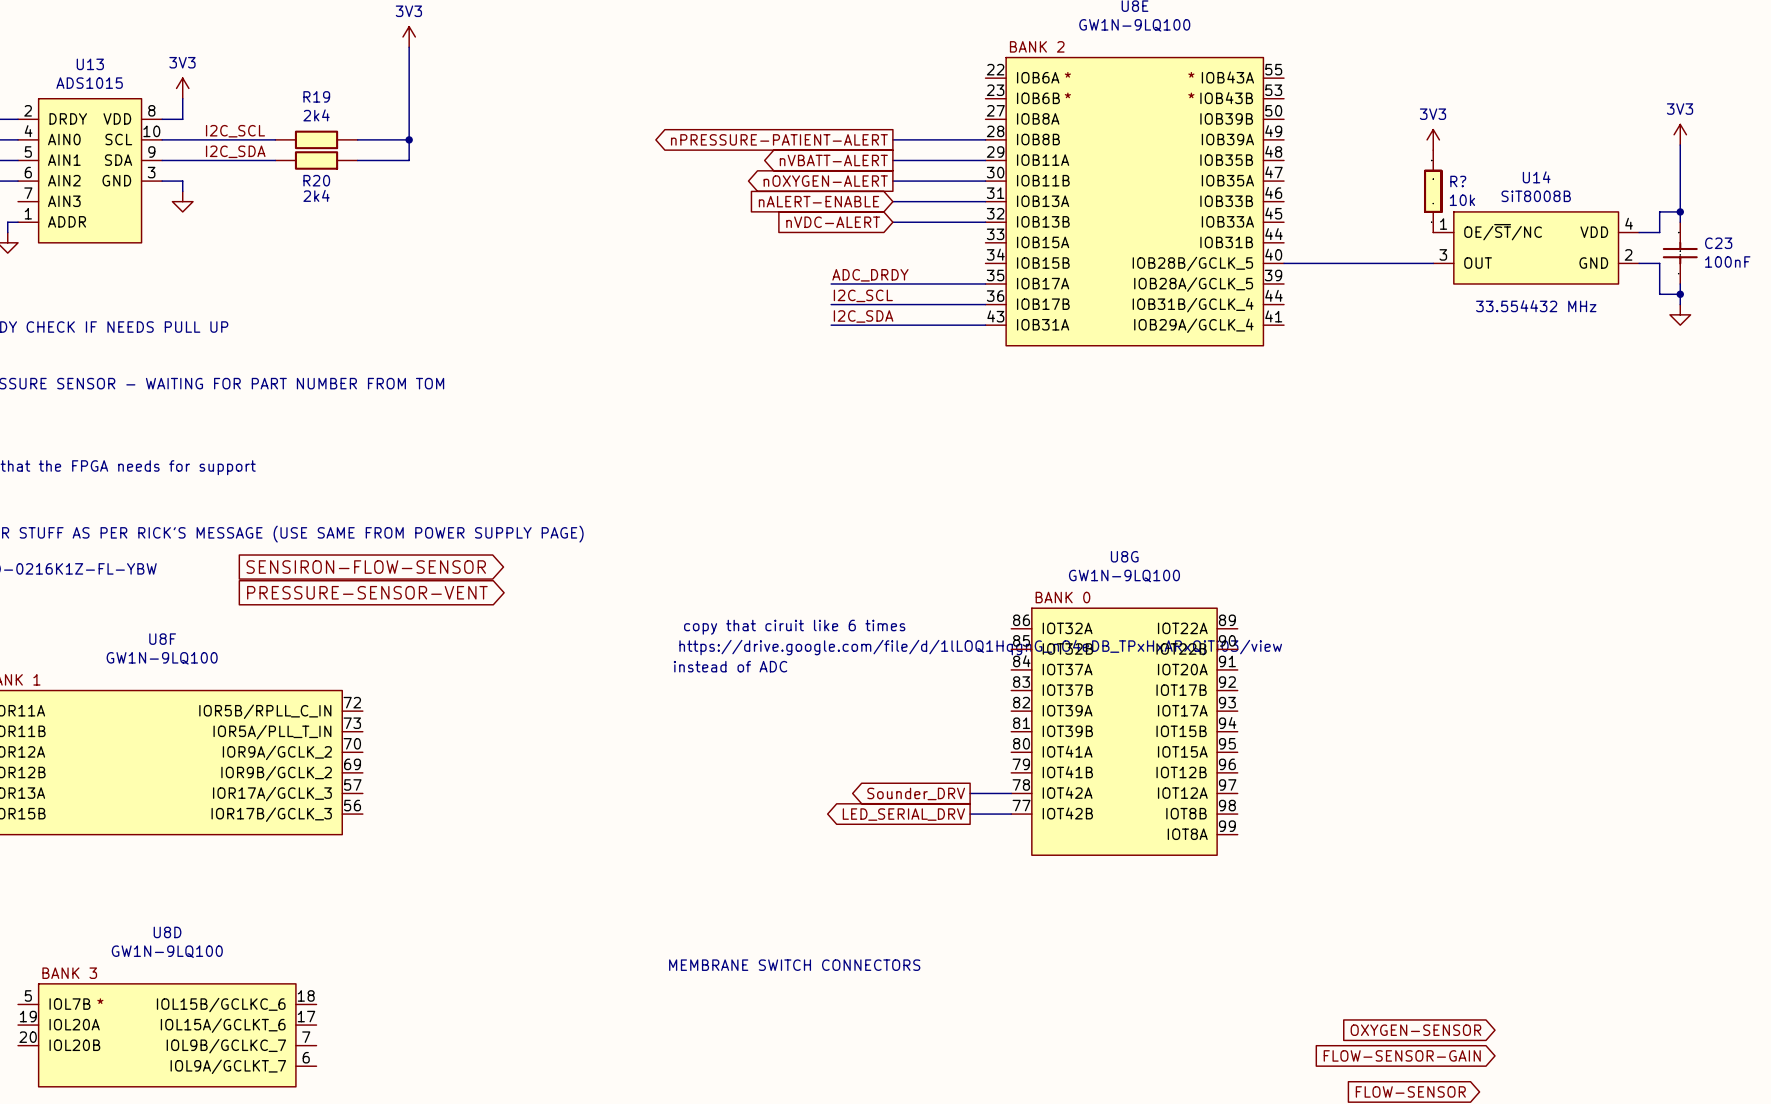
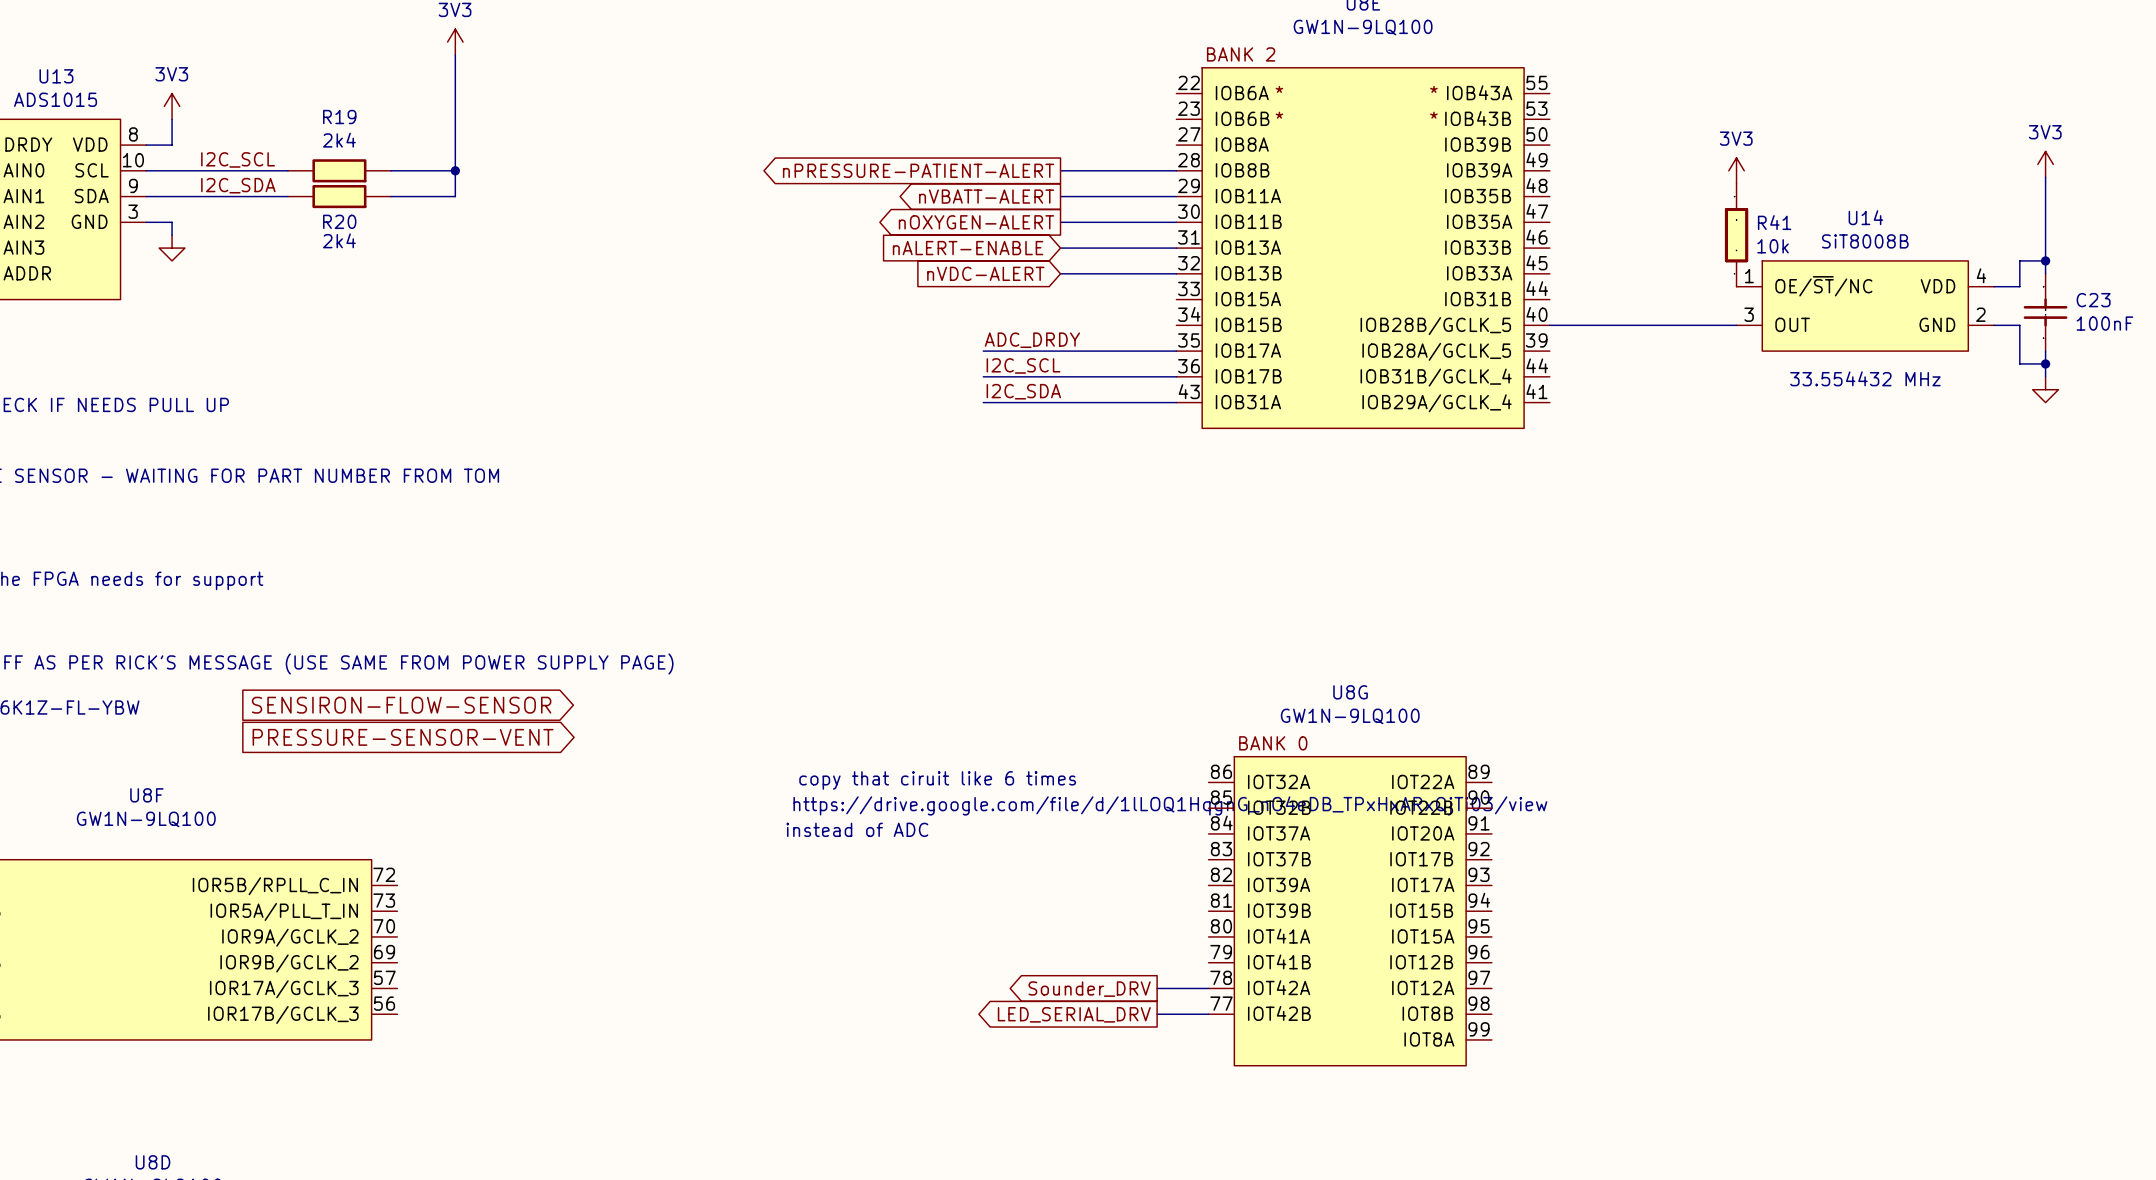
R? name: R? (1458, 181) -> R41 (1774, 222)

